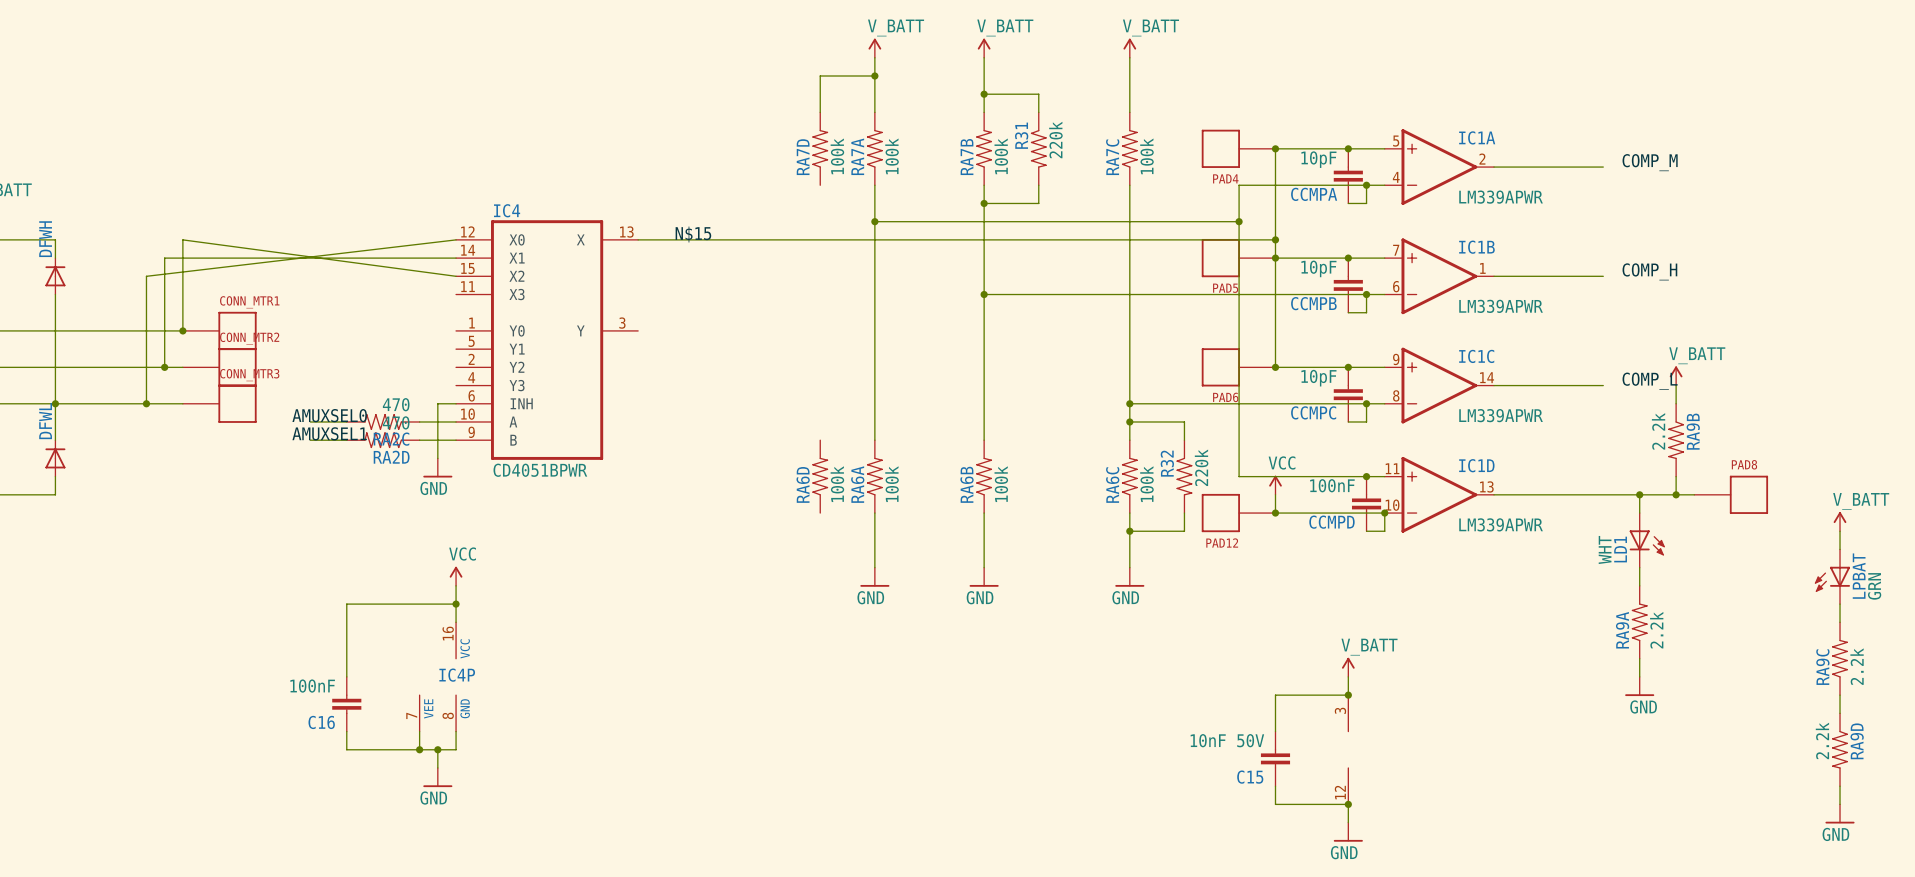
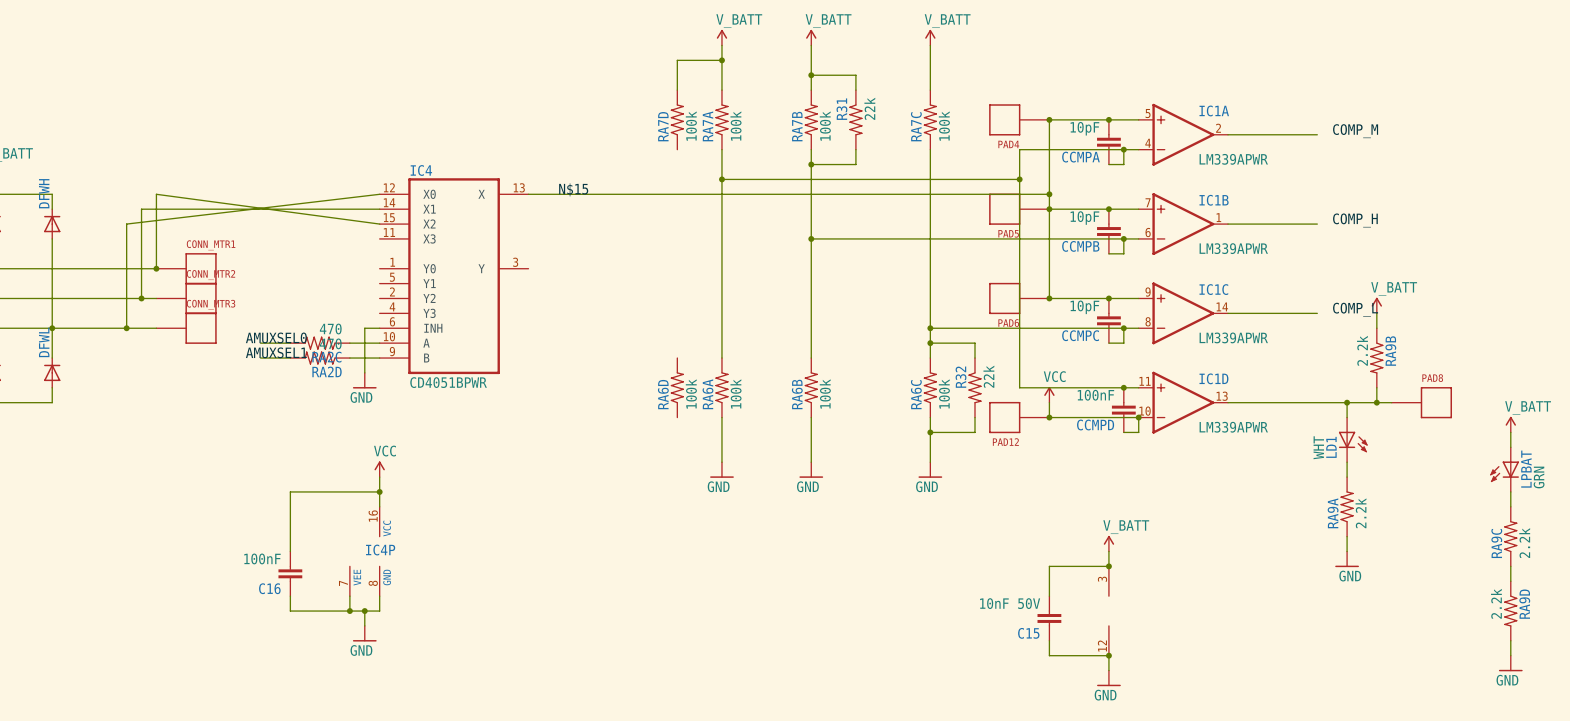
R31 value: 220k (1055, 140) -> 22k (869, 108)
R32 value: 220k (1201, 467) -> 22k (988, 376)

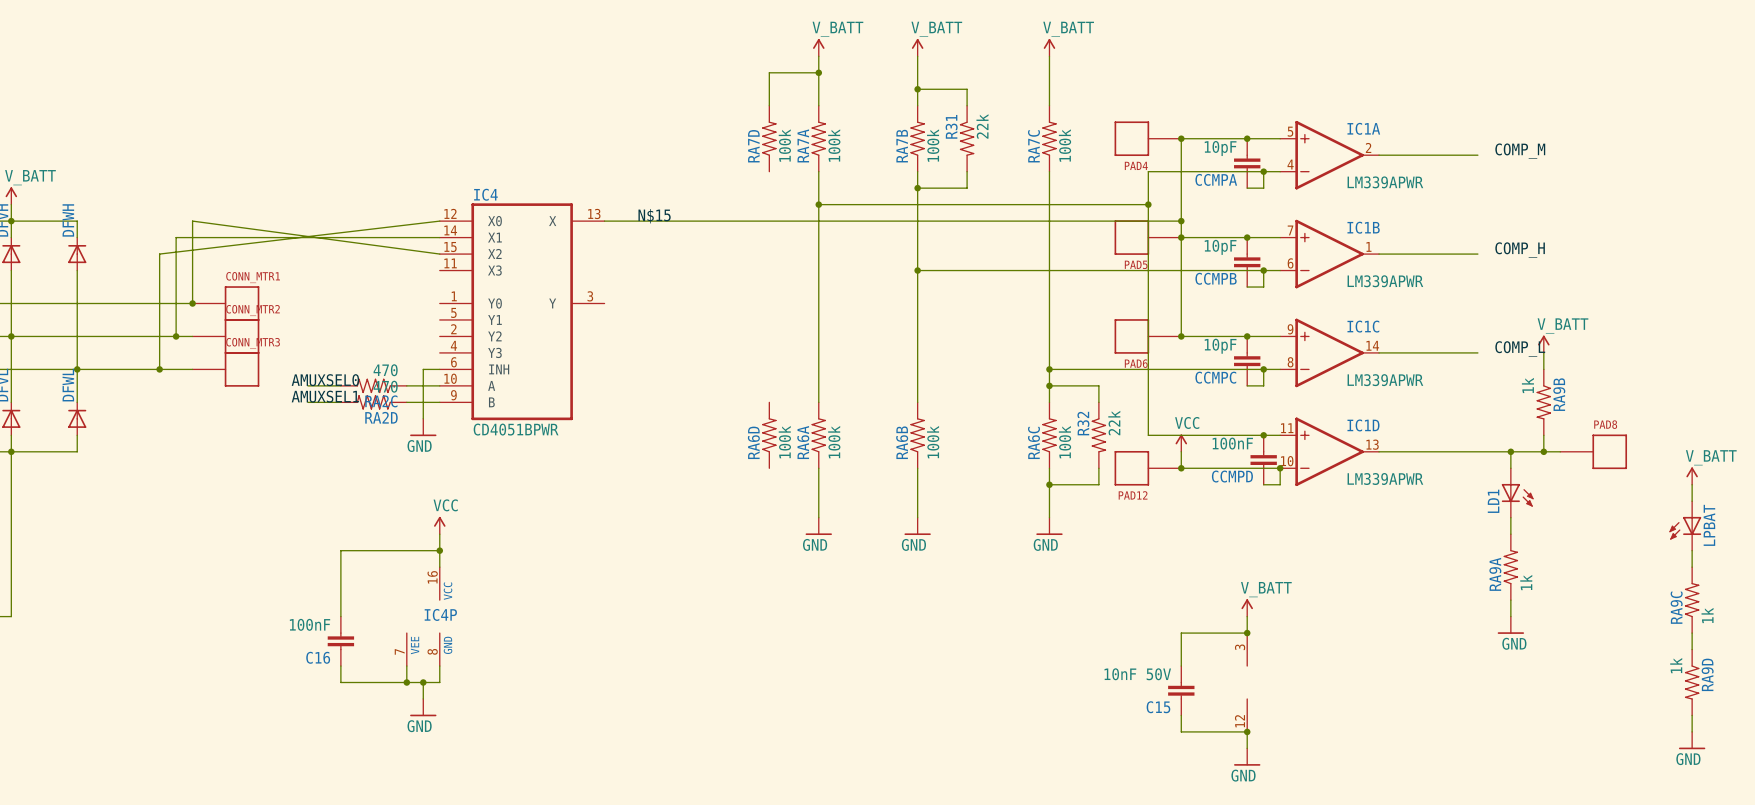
RA9B value: 2.2k (1362, 350) -> 1k (1527, 385)
LD1 value: WHT (1318, 447) -> none
LPBAT value: GRN (1539, 477) -> none
RA9A value: 2.2k (1360, 513) -> 1k (1526, 582)
RA9C value: 2.2k (1524, 543) -> 1k (1707, 615)
RA9D value: 2.2k (1496, 603) -> 1k (1676, 665)

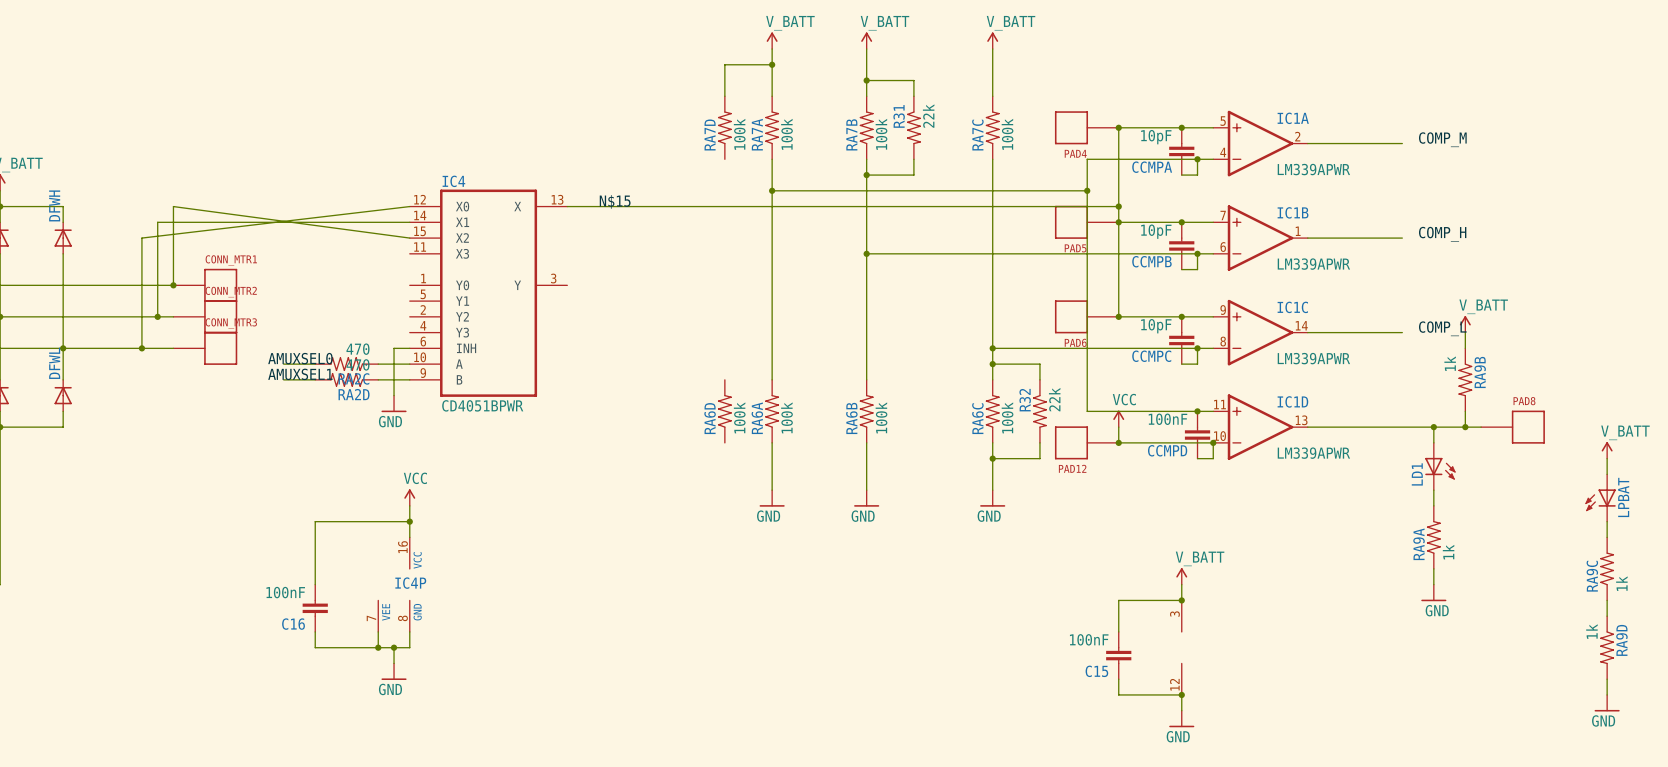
C15 value: 10nF 50V (1137, 674) -> 100nF (1089, 639)

